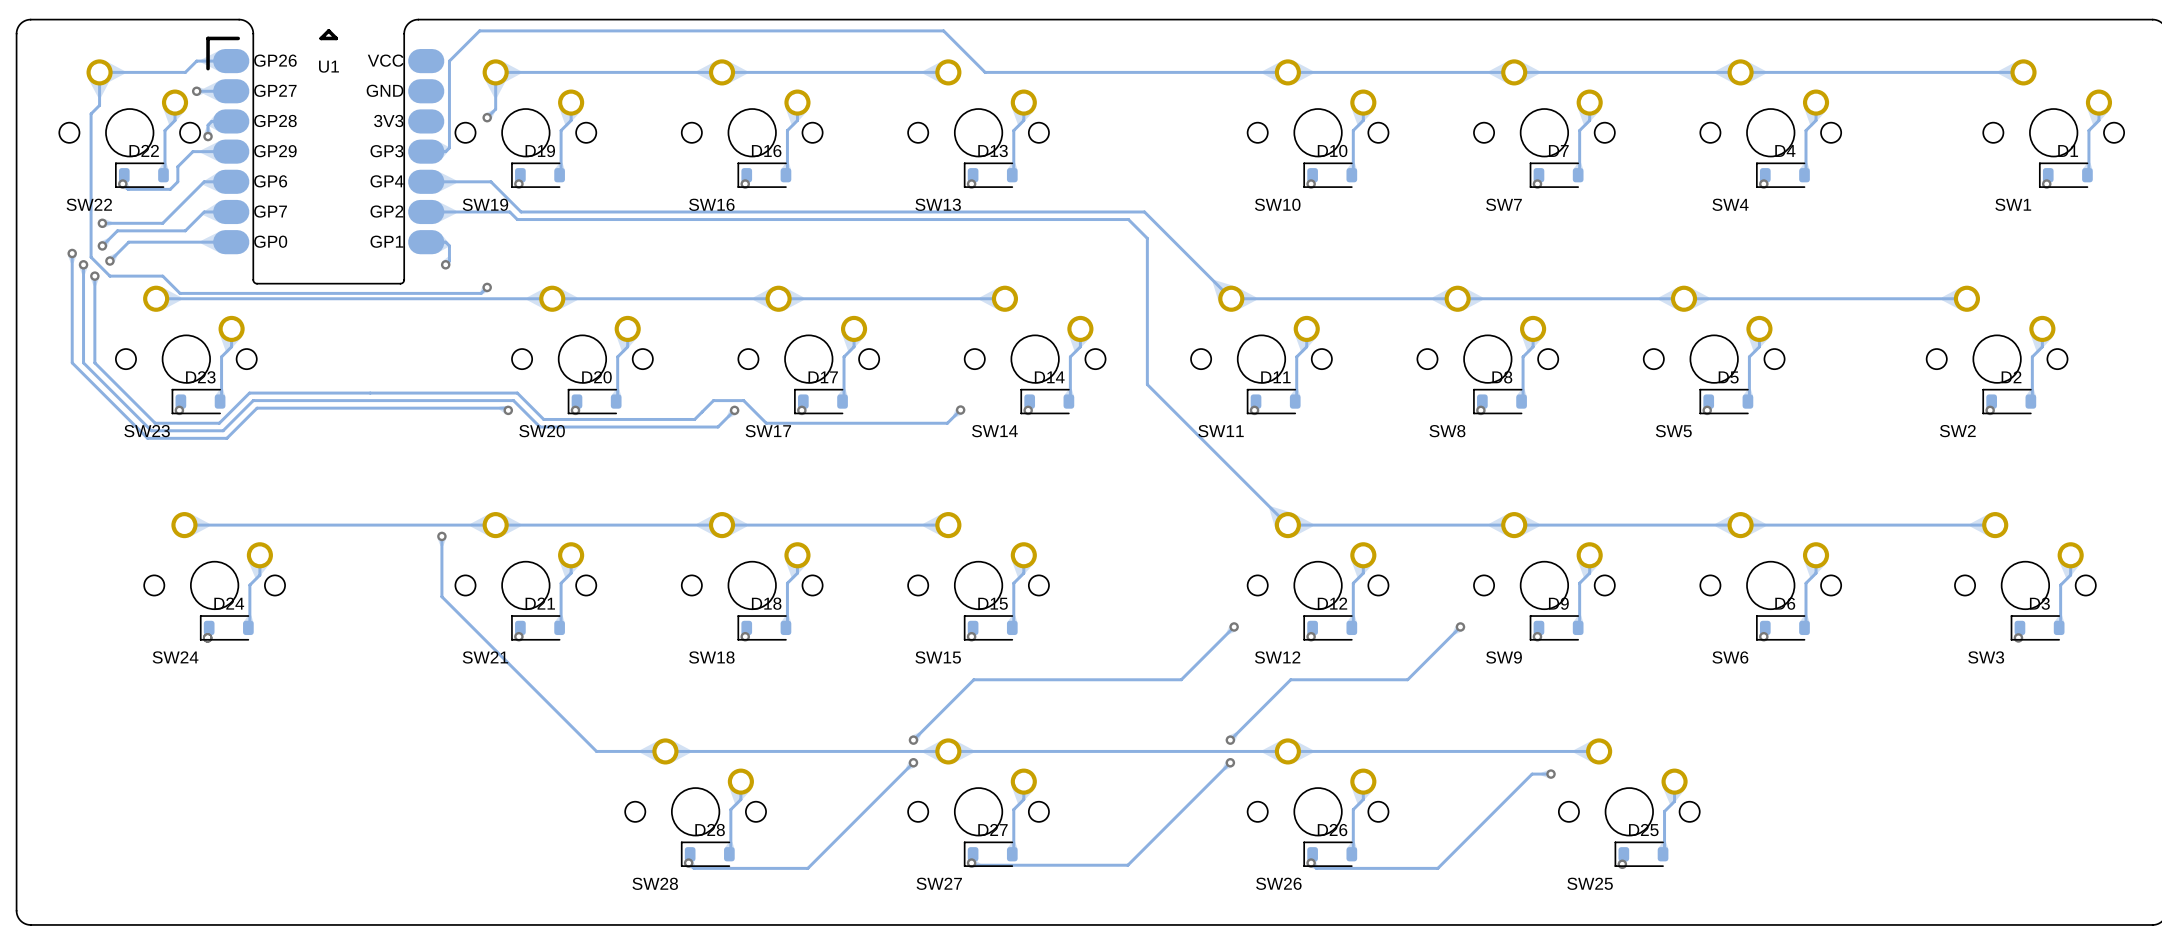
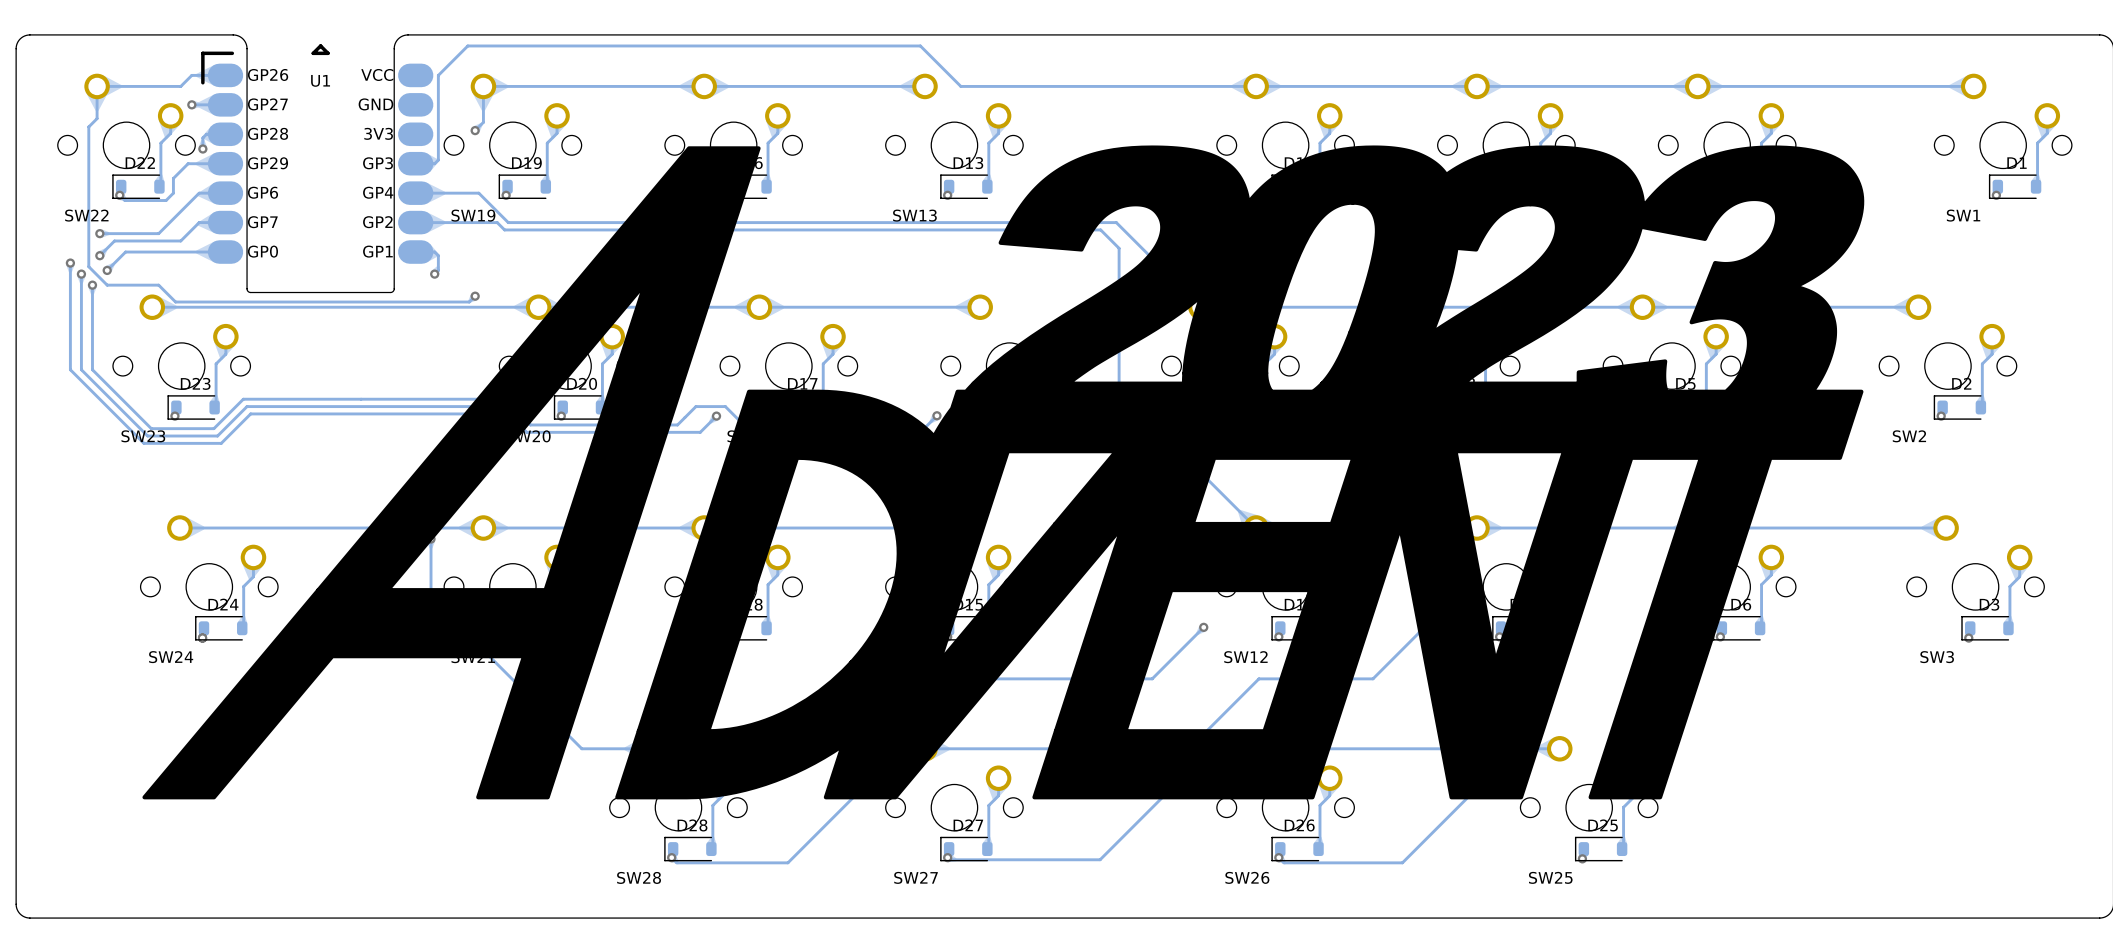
drawing: none -> [142, 145, 1865, 800]

